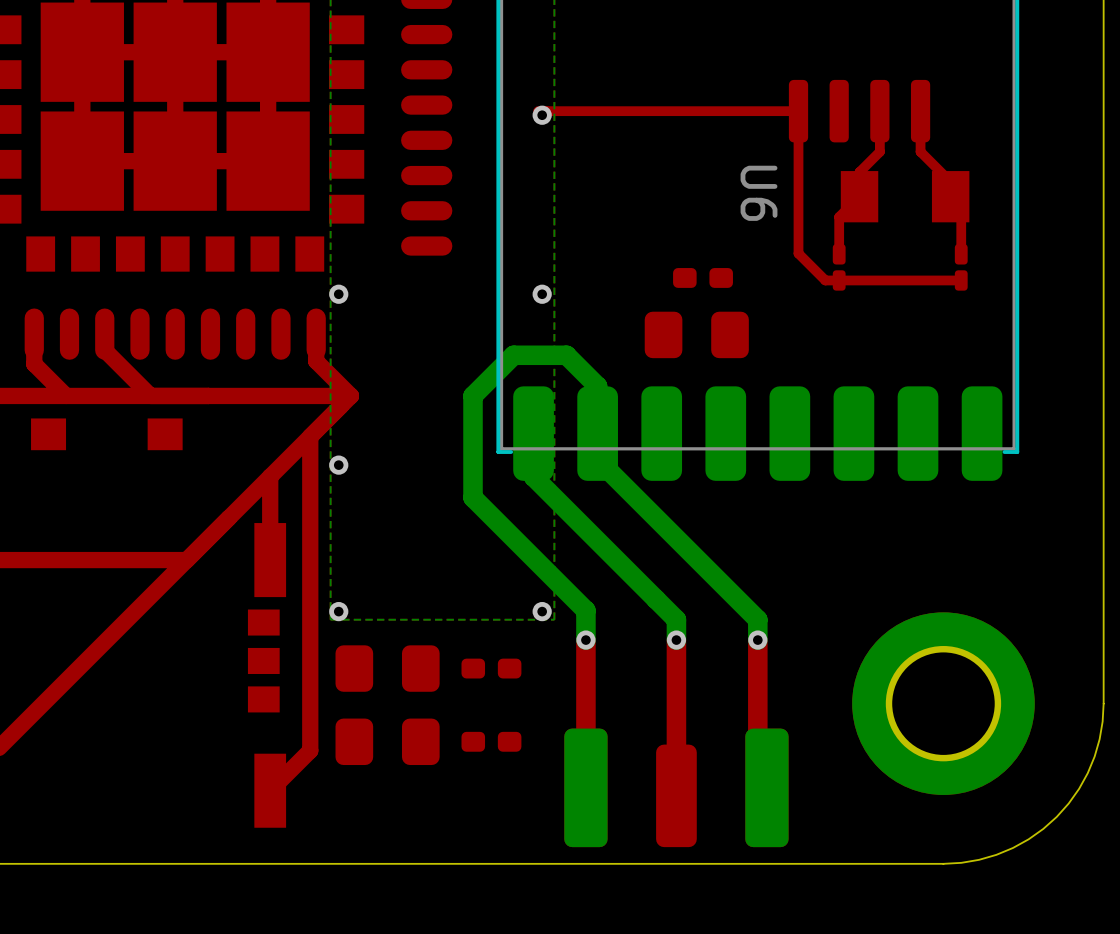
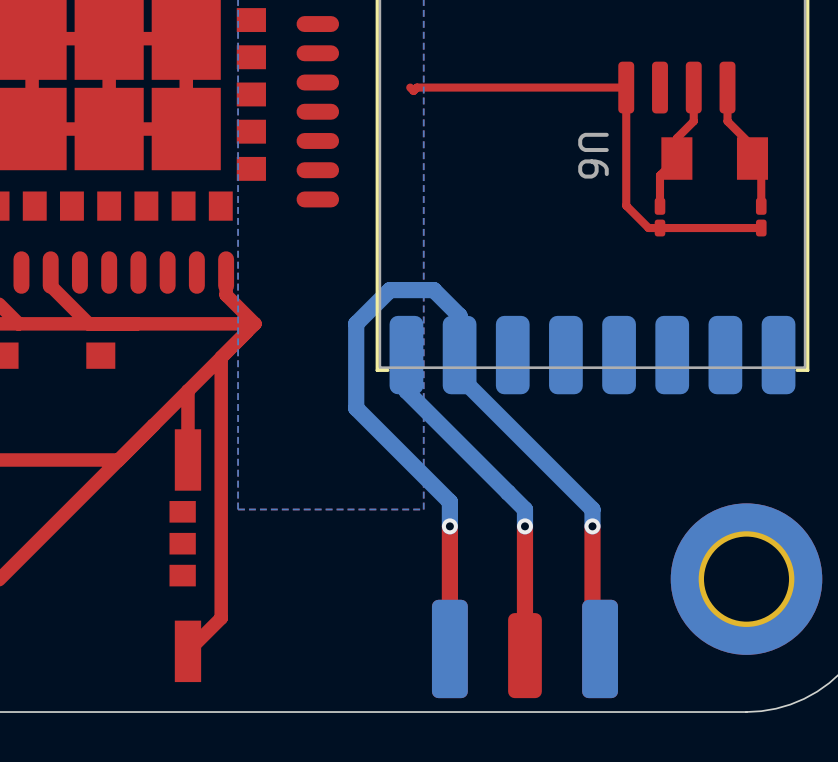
via: (542, 115) -> none
part: (703, 277) -> none
via: (338, 294) -> none
via: (542, 294) -> none
part: (696, 334) -> none
via: (338, 465) -> none
via: (338, 611) -> none
via: (542, 611) -> none
part: (387, 668) -> none
part: (491, 668) -> none
part: (387, 741) -> none
part: (491, 741) -> none

